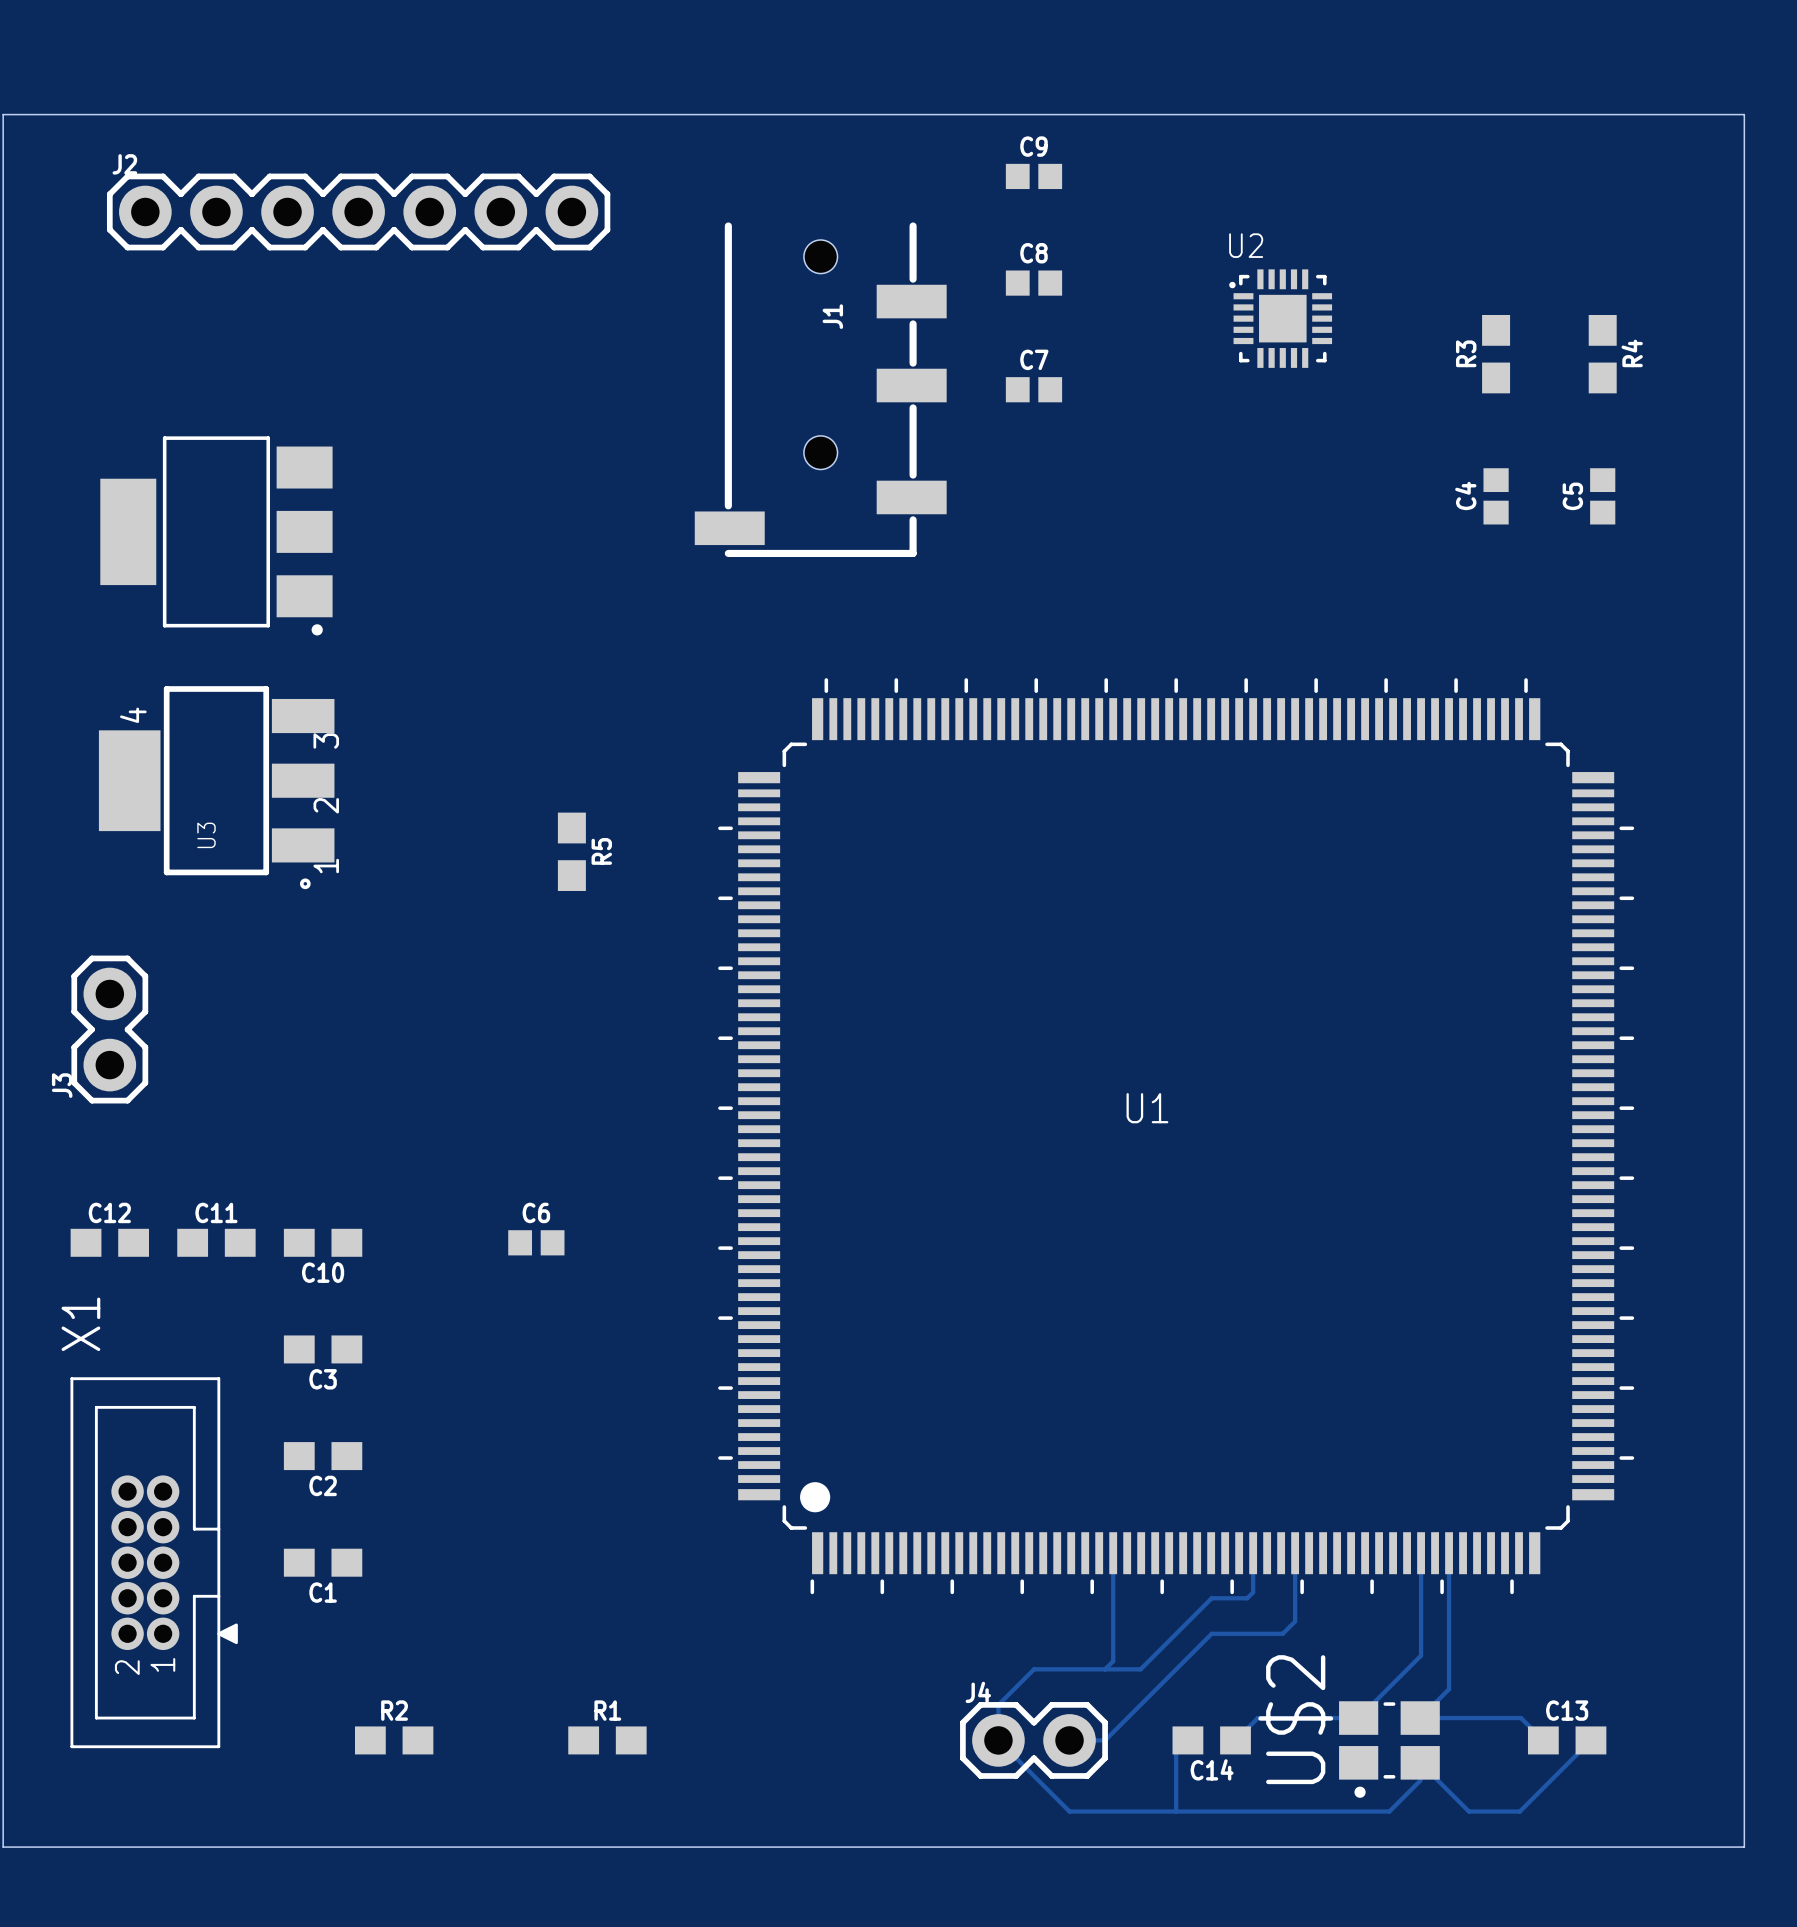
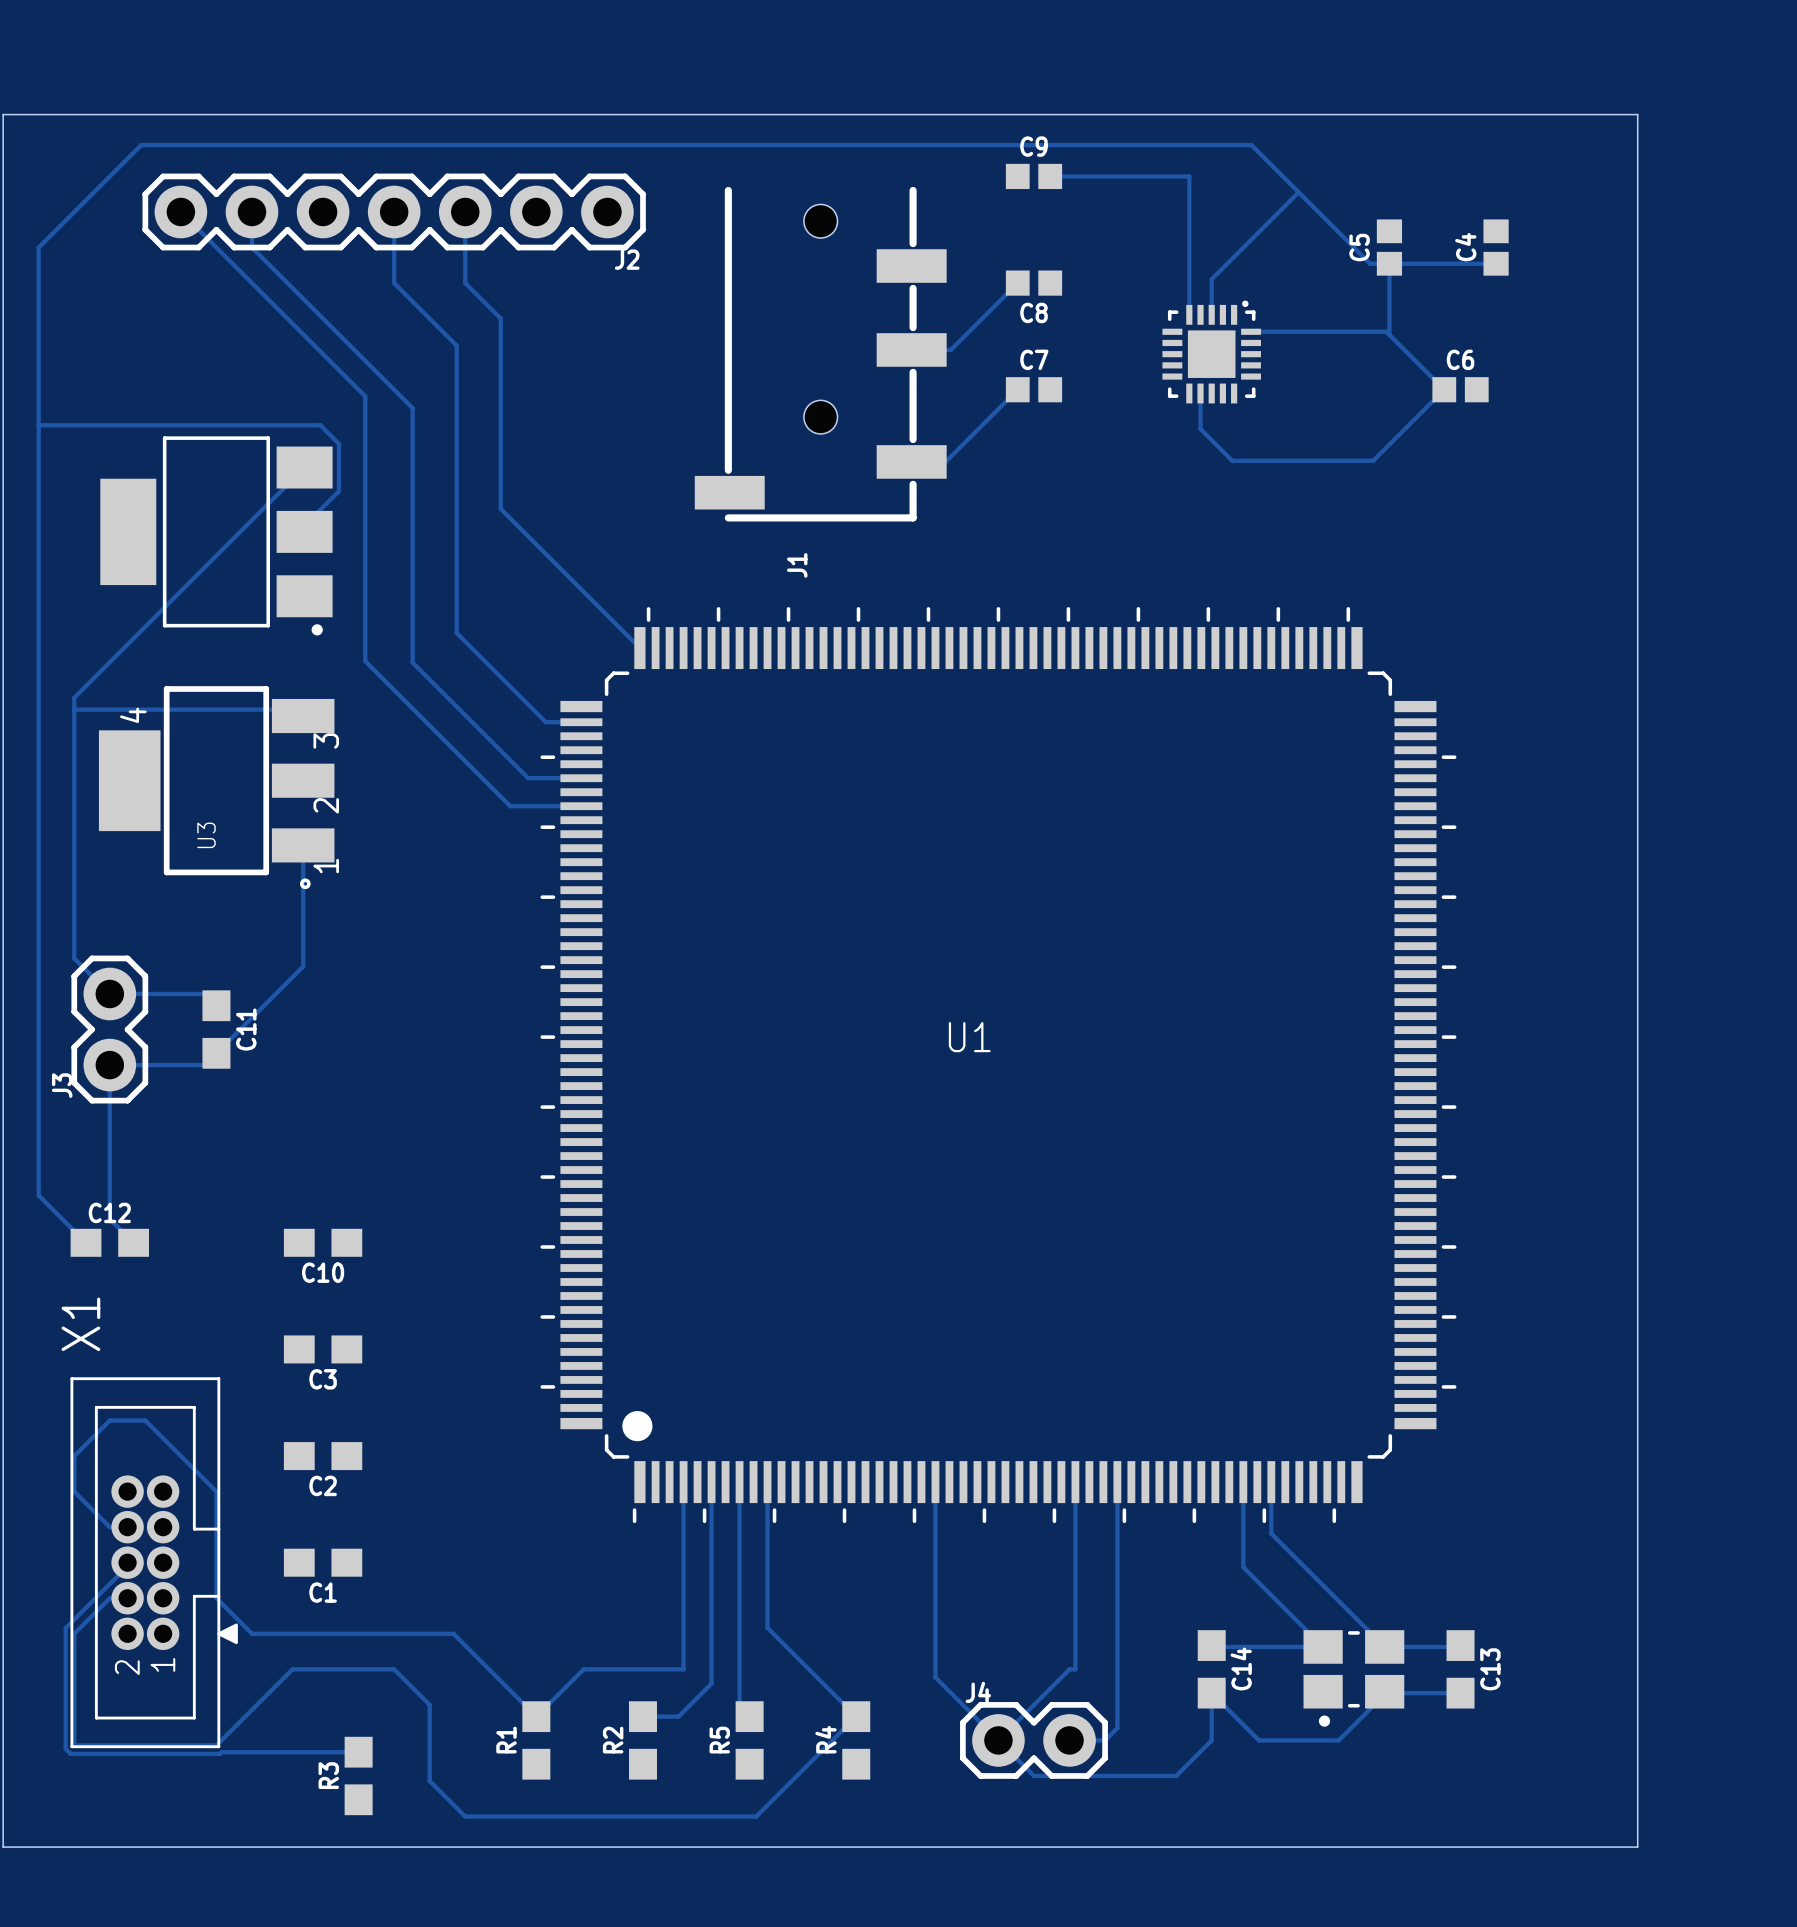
board edge: (1637, 114) (1744, 114) (1744, 1847) (1637, 1847) -> (1637, 114) (1637, 1847)
J2 name position: J2 (124, 164) -> J2 (627, 259)
track: none -> (1050, 176) (1189, 176) (1189, 314)
track: none -> (1298, 192) (1211, 279) (1211, 314)
track: none -> (180, 211) (365, 396) (365, 661) (510, 806) (581, 806)
track: none -> (251, 211) (251, 247) (412, 408) (412, 662) (528, 778) (581, 778)
J2 position: (358, 211) -> (394, 211)
track: none -> (394, 211) (394, 283) (456, 345) (456, 633) (545, 722) (581, 722)
track: none -> (465, 211) (465, 283) (500, 318) (500, 508) (639, 648)
C8 name position: C8 (1033, 253) -> C8 (1033, 312)
track: none -> (1389, 263) (1389, 334)
track: none -> (1496, 263) (1370, 263) (1251, 145) (141, 145) (38, 247) (38, 1195) (86, 1242)
track: none -> (1017, 283) (950, 349) (911, 349)
J1 name position: J1 (832, 316) -> J1 (797, 565)
U2: (1280, 318) -> none
track: none -> (1251, 331) (1386, 331) (1444, 389) (1373, 460) (1232, 460) (1200, 429) (1200, 393)
part: none -> (1211, 352)
R4 name position: R4 (1632, 353) -> R4 (826, 1739)
R3 position: (1496, 354) -> (358, 1775)
R4 position: (1602, 354) -> (856, 1740)
J1 position: (820, 389) -> (820, 354)
track: none -> (1017, 389) (945, 461) (911, 461)
track: none -> (38, 425) (320, 425) (339, 443) (339, 491) (304, 525) (304, 531)
track: none -> (304, 467) (74, 697) (74, 958) (109, 993) (204, 993) (216, 1005)
C4 position: (1496, 496) -> (1496, 247)
C5 position: (1602, 496) -> (1389, 247)
track: none -> (74, 709) (296, 709) (303, 716)
track: none -> (303, 845) (303, 966) (204, 1065) (109, 1065) (109, 1219) (133, 1242)
R5 position: (571, 851) -> (749, 1740)
R5 name position: R5 (601, 851) -> R5 (719, 1740)
U1 position: (1176, 1136) -> (998, 1065)
C11 rotation: 0° (216, 1242) -> 90° clockwise (216, 1029)
C11 position: (216, 1242) -> (216, 1029)
C6 position: (536, 1242) -> (1460, 389)
track: none -> (683, 1482) (683, 1669) (583, 1669) (536, 1716) (453, 1633) (251, 1633) (216, 1598) (216, 1491) (145, 1420) (109, 1420) (74, 1456) (74, 1491) (109, 1527) (127, 1527)
track: none -> (711, 1482) (711, 1683) (678, 1716) (642, 1716)
track: none -> (739, 1482) (739, 1706) (749, 1716)
track: none -> (767, 1482) (767, 1627) (856, 1716) (756, 1816) (465, 1816) (429, 1780) (429, 1704) (394, 1669) (292, 1669) (216, 1745) (74, 1745) (74, 1633) (109, 1598) (127, 1598)
track: none -> (1243, 1482) (1243, 1567) (1323, 1646) (1211, 1645)
track: none -> (1271, 1482) (1271, 1533) (1384, 1646) (1460, 1645)
track: (1113, 1553) (1113, 1661) (1105, 1669) -> none
track: (1253, 1553) (1253, 1592) (1247, 1598) (1211, 1598) (1140, 1669) (1075, 1669) -> (1075, 1482) (1075, 1669)
track: (1295, 1553) (1295, 1621) (1282, 1633) (1211, 1633) (1117, 1728) -> (1117, 1482) (1117, 1728)
track: (1421, 1553) (1421, 1655) (1358, 1718) (1257, 1718) (1235, 1740) -> none
track: (1449, 1553) (1449, 1689) (1420, 1718) (1520, 1718) (1543, 1740) -> none
track: none -> (127, 1562) (127, 1566) (65, 1628) (65, 1748) (70, 1753) (358, 1752)
track: (1069, 1669) (1033, 1669) (998, 1704) (998, 1740) -> (1069, 1669) (998, 1740) (935, 1677) (935, 1482)
part: none -> (1353, 1678)
R2 rotation: 0° (394, 1740) -> 90° clockwise (642, 1740)
R2 position: (394, 1740) -> (642, 1740)
R1 rotation: 0° (607, 1740) -> 90° clockwise (536, 1740)
R1 position: (607, 1740) -> (536, 1740)
track: (1187, 1740) (1176, 1752) (1176, 1811) -> none
C14 rotation: 0° (1211, 1740) -> 90° clockwise (1211, 1669)
C14 position: (1211, 1740) -> (1211, 1669)
C13 rotation: 0° (1567, 1740) -> 90° clockwise (1460, 1669)
C13 position: (1567, 1740) -> (1460, 1669)
track: (1590, 1740) (1519, 1811) (1468, 1811) (1420, 1762) (1420, 1780) (1389, 1811) (1069, 1811) (1033, 1775) -> (1460, 1693) (1386, 1693) (1338, 1740) (1259, 1740) (1211, 1693) (1211, 1740) (1176, 1775) (1033, 1775)
U$2: (1389, 1749) -> none

